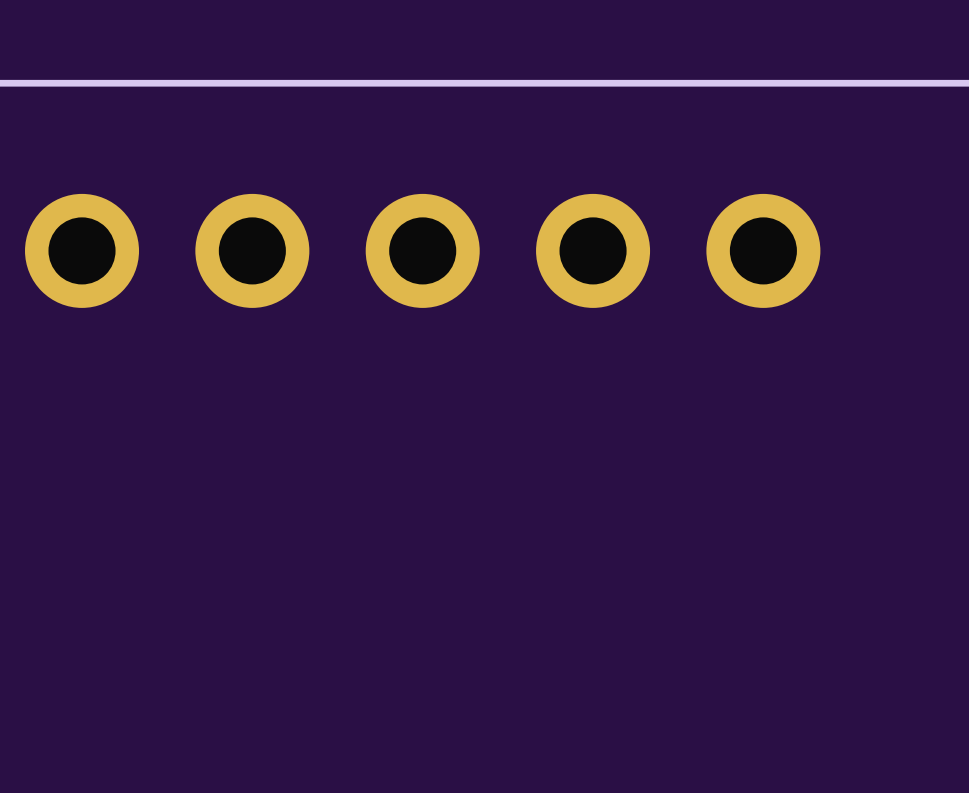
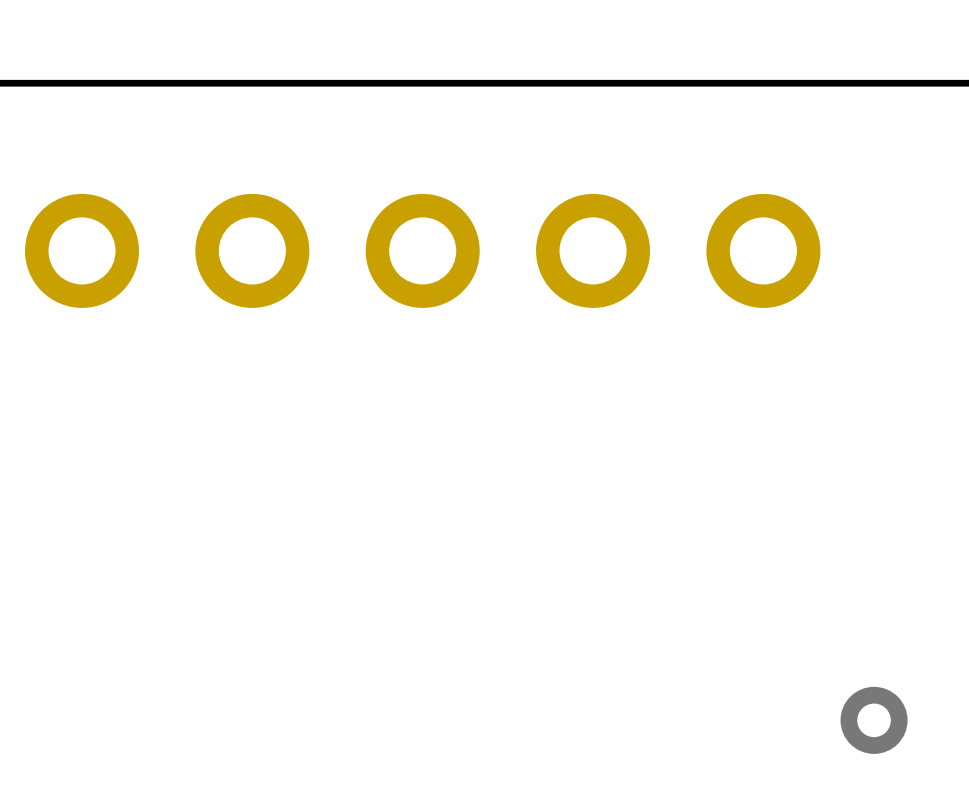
via: none -> (874, 720)

